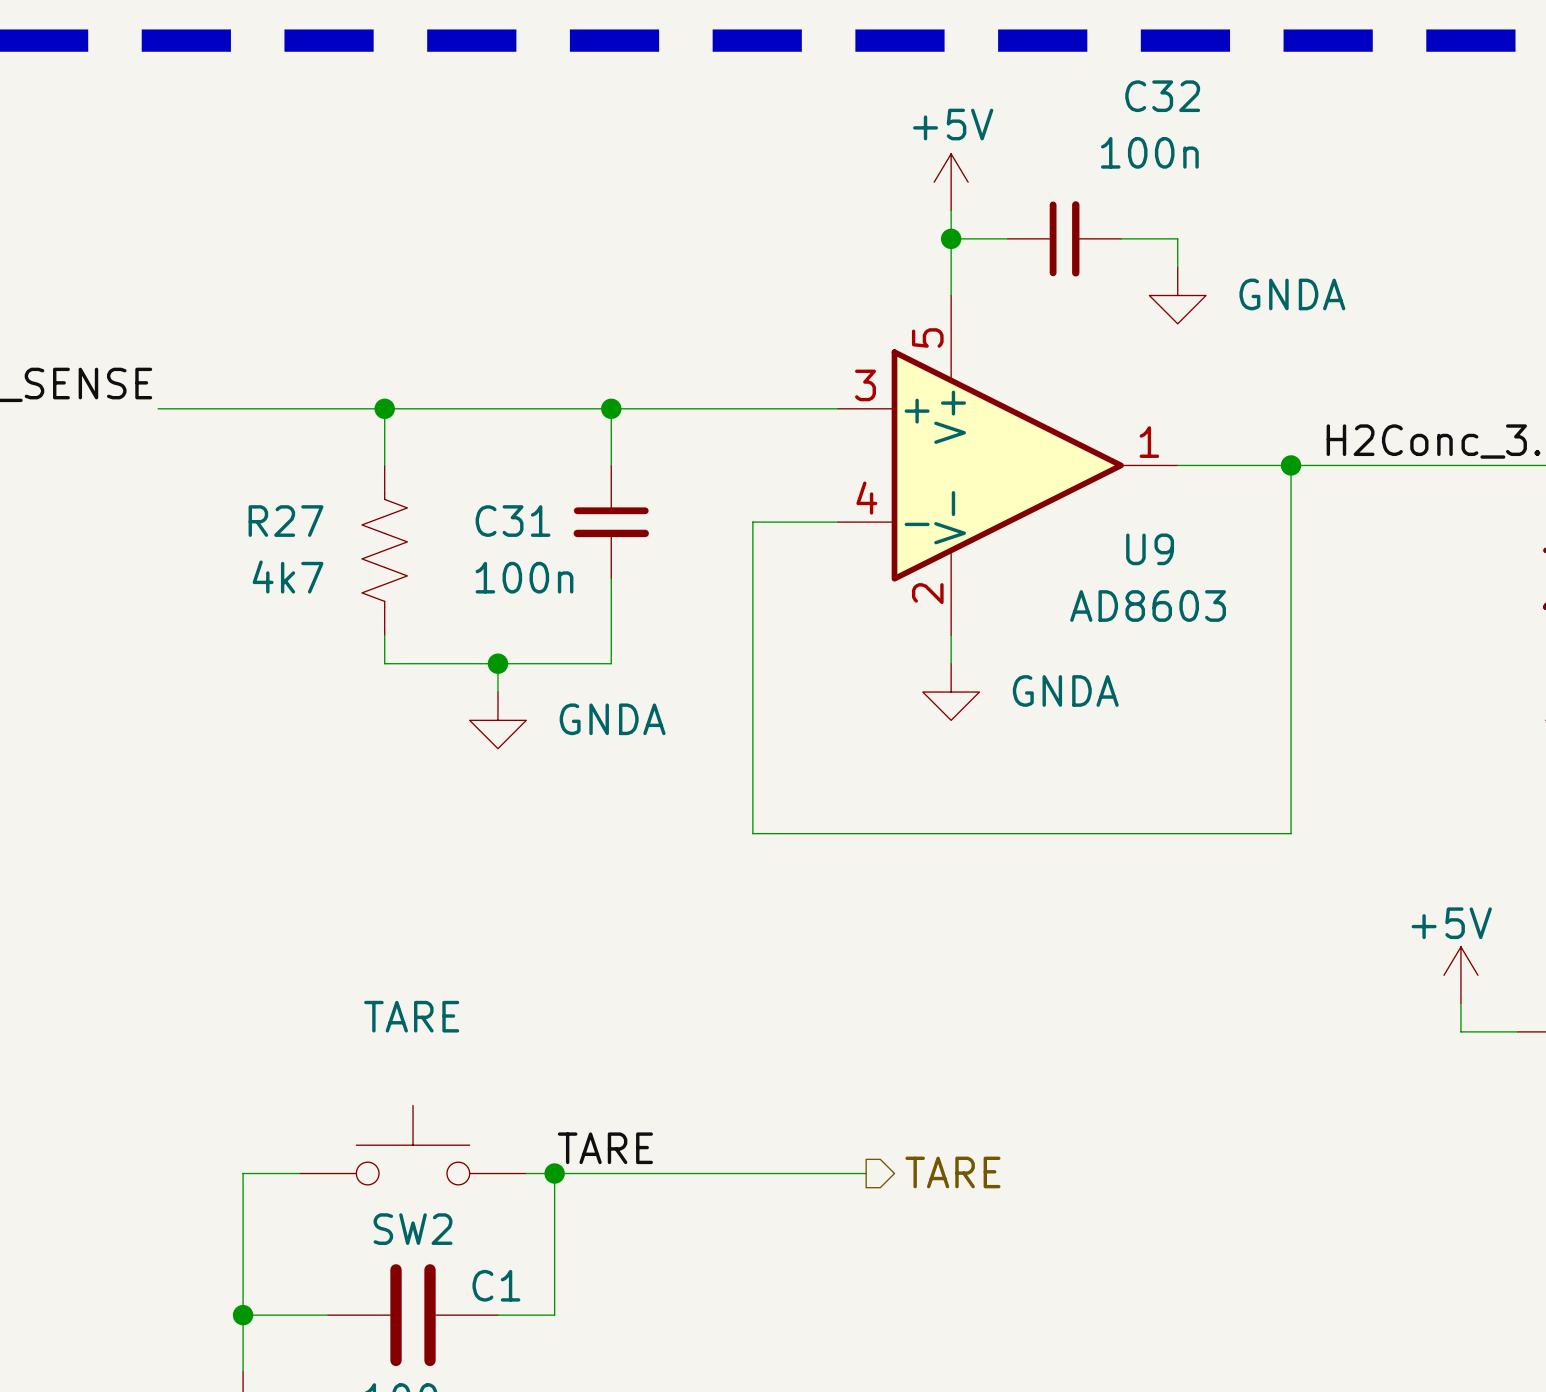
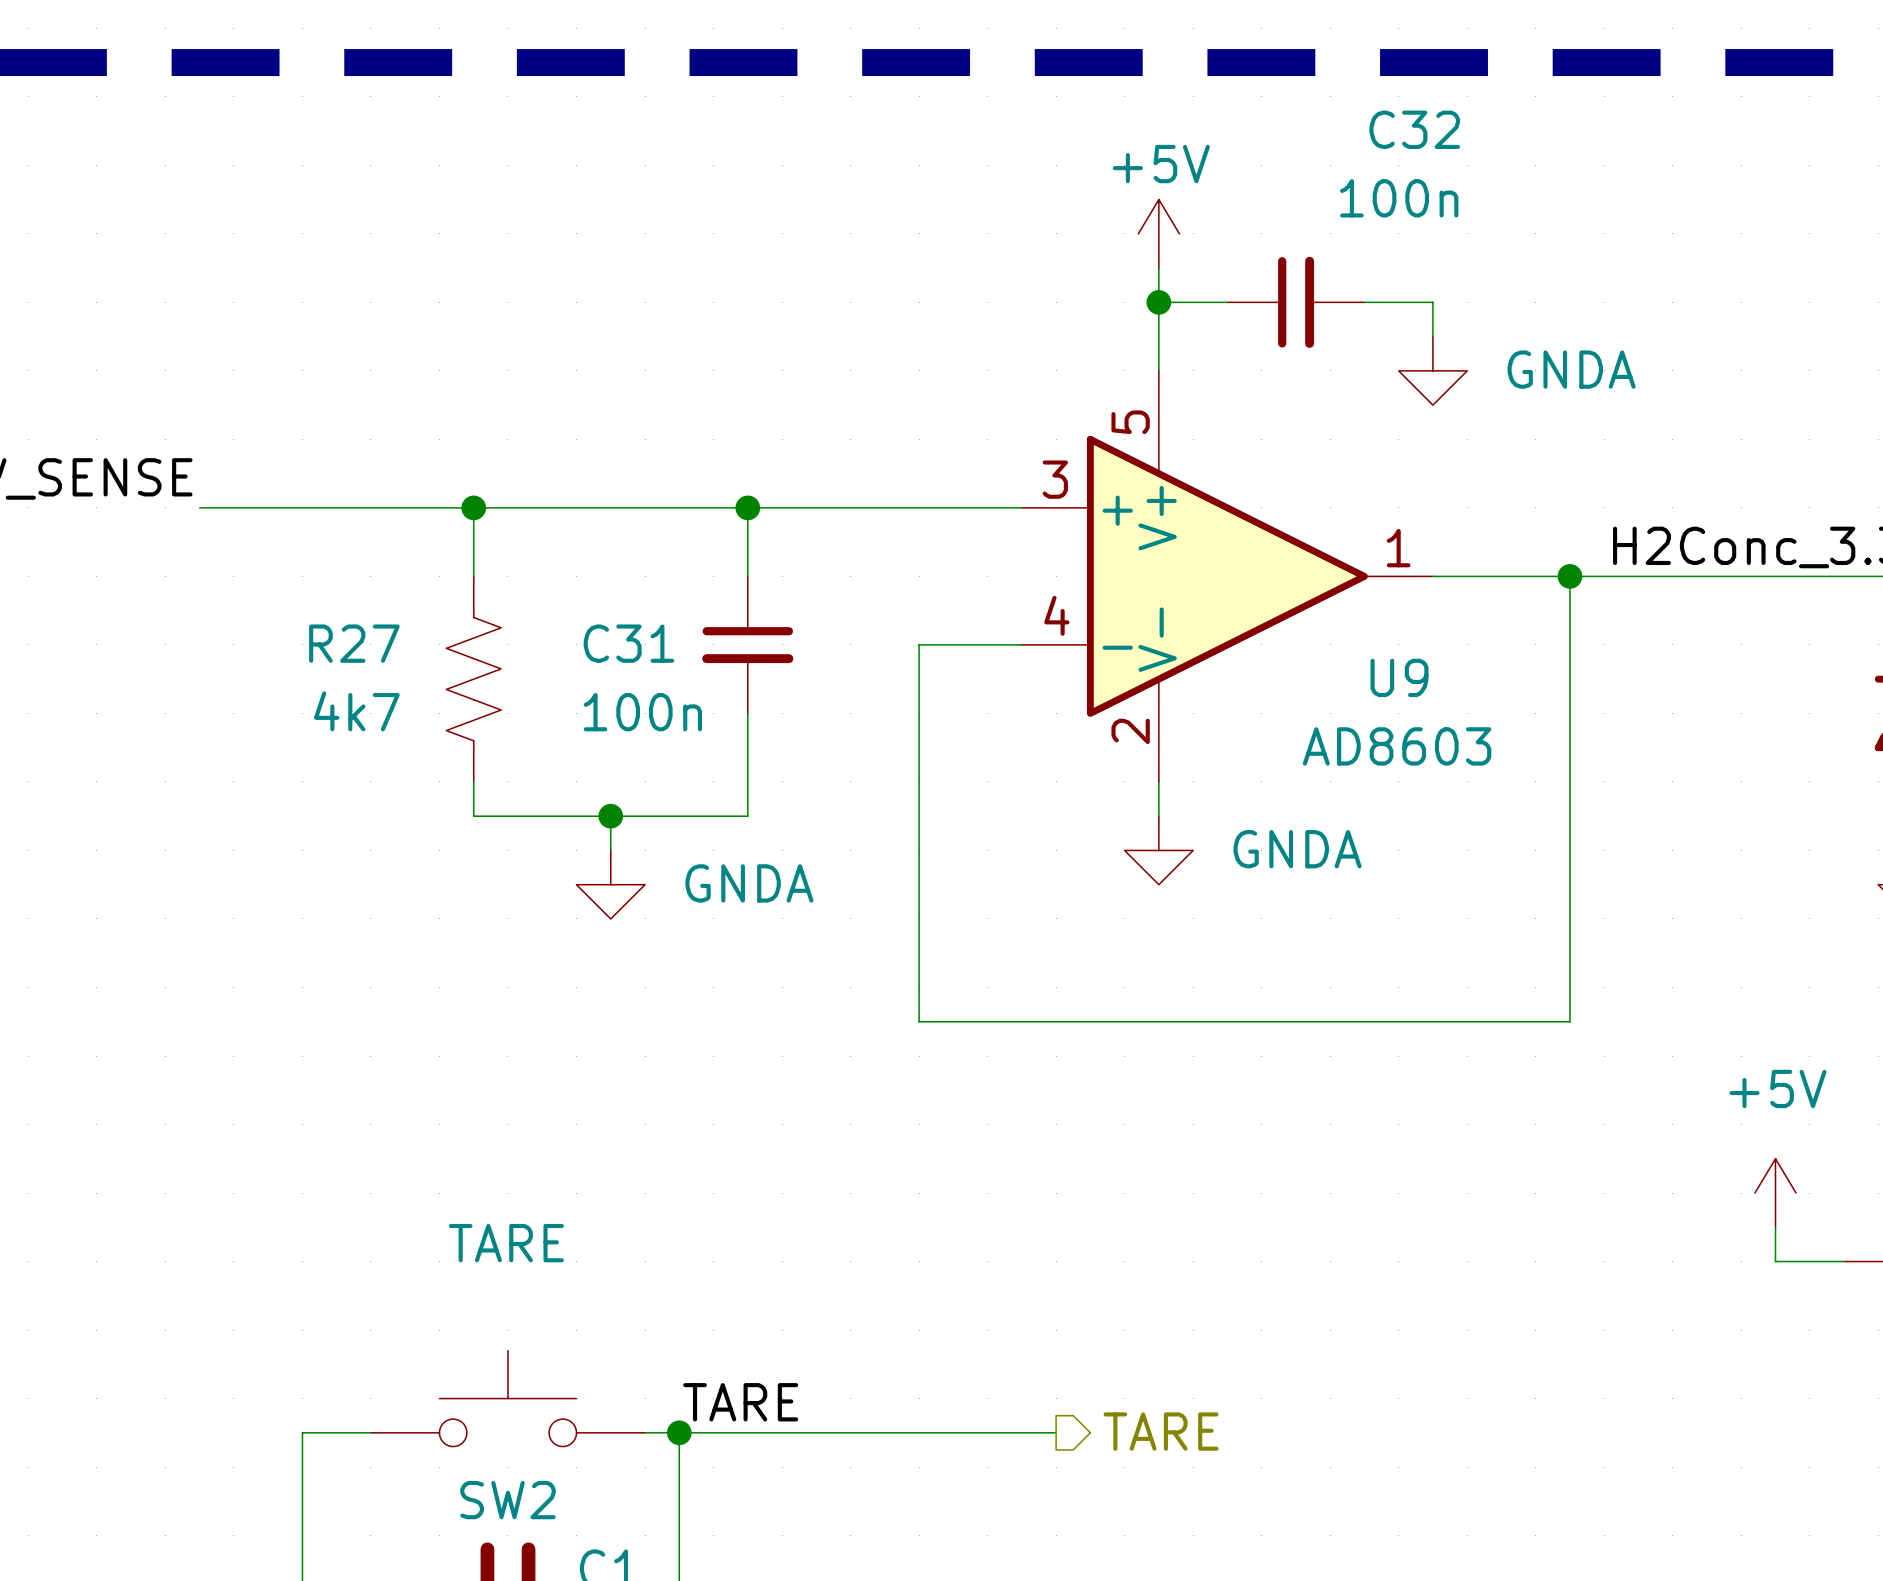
power symbol text position: +5V (1451, 923) -> +5V (1777, 1088)

